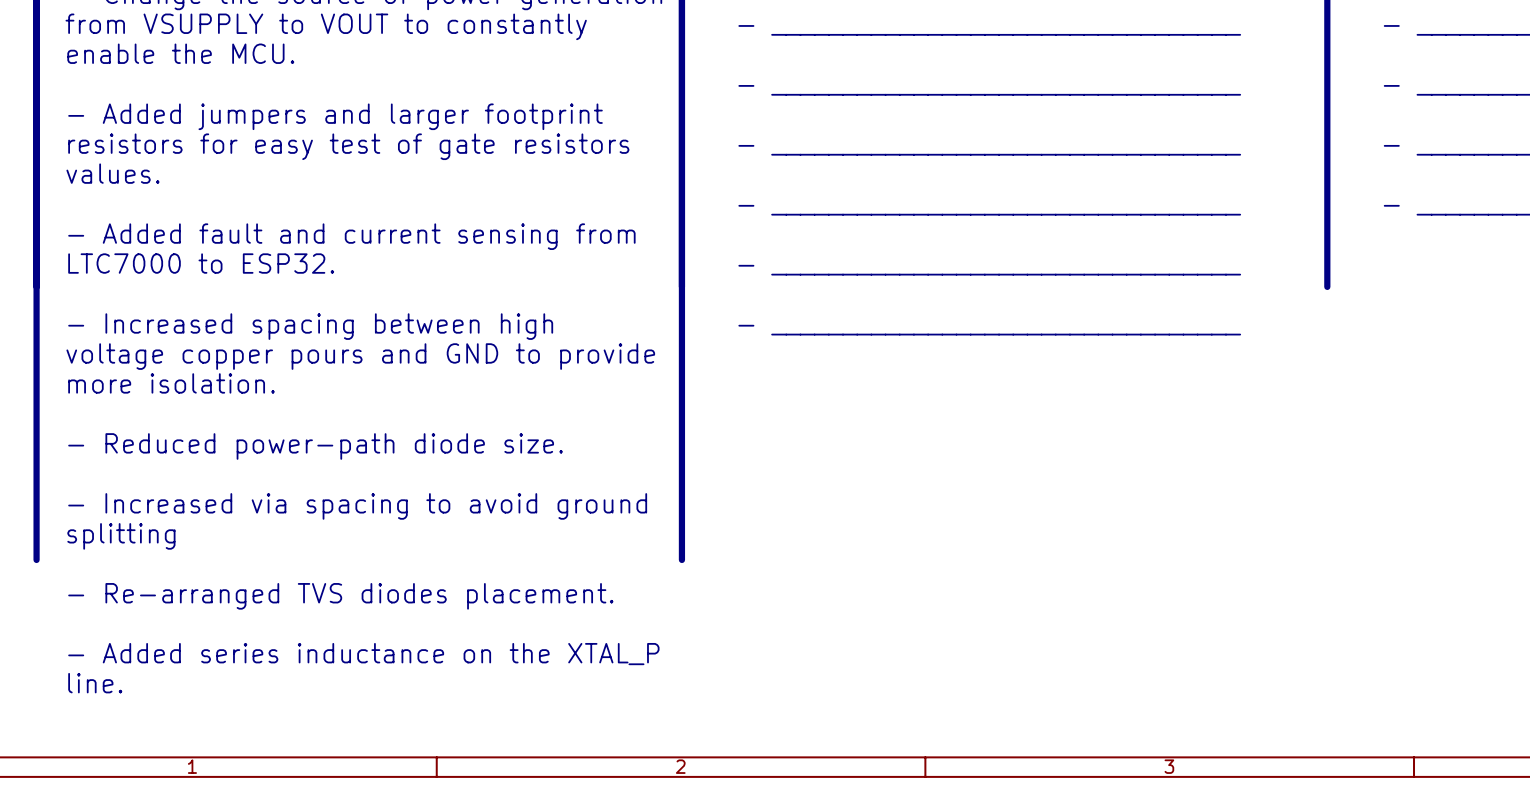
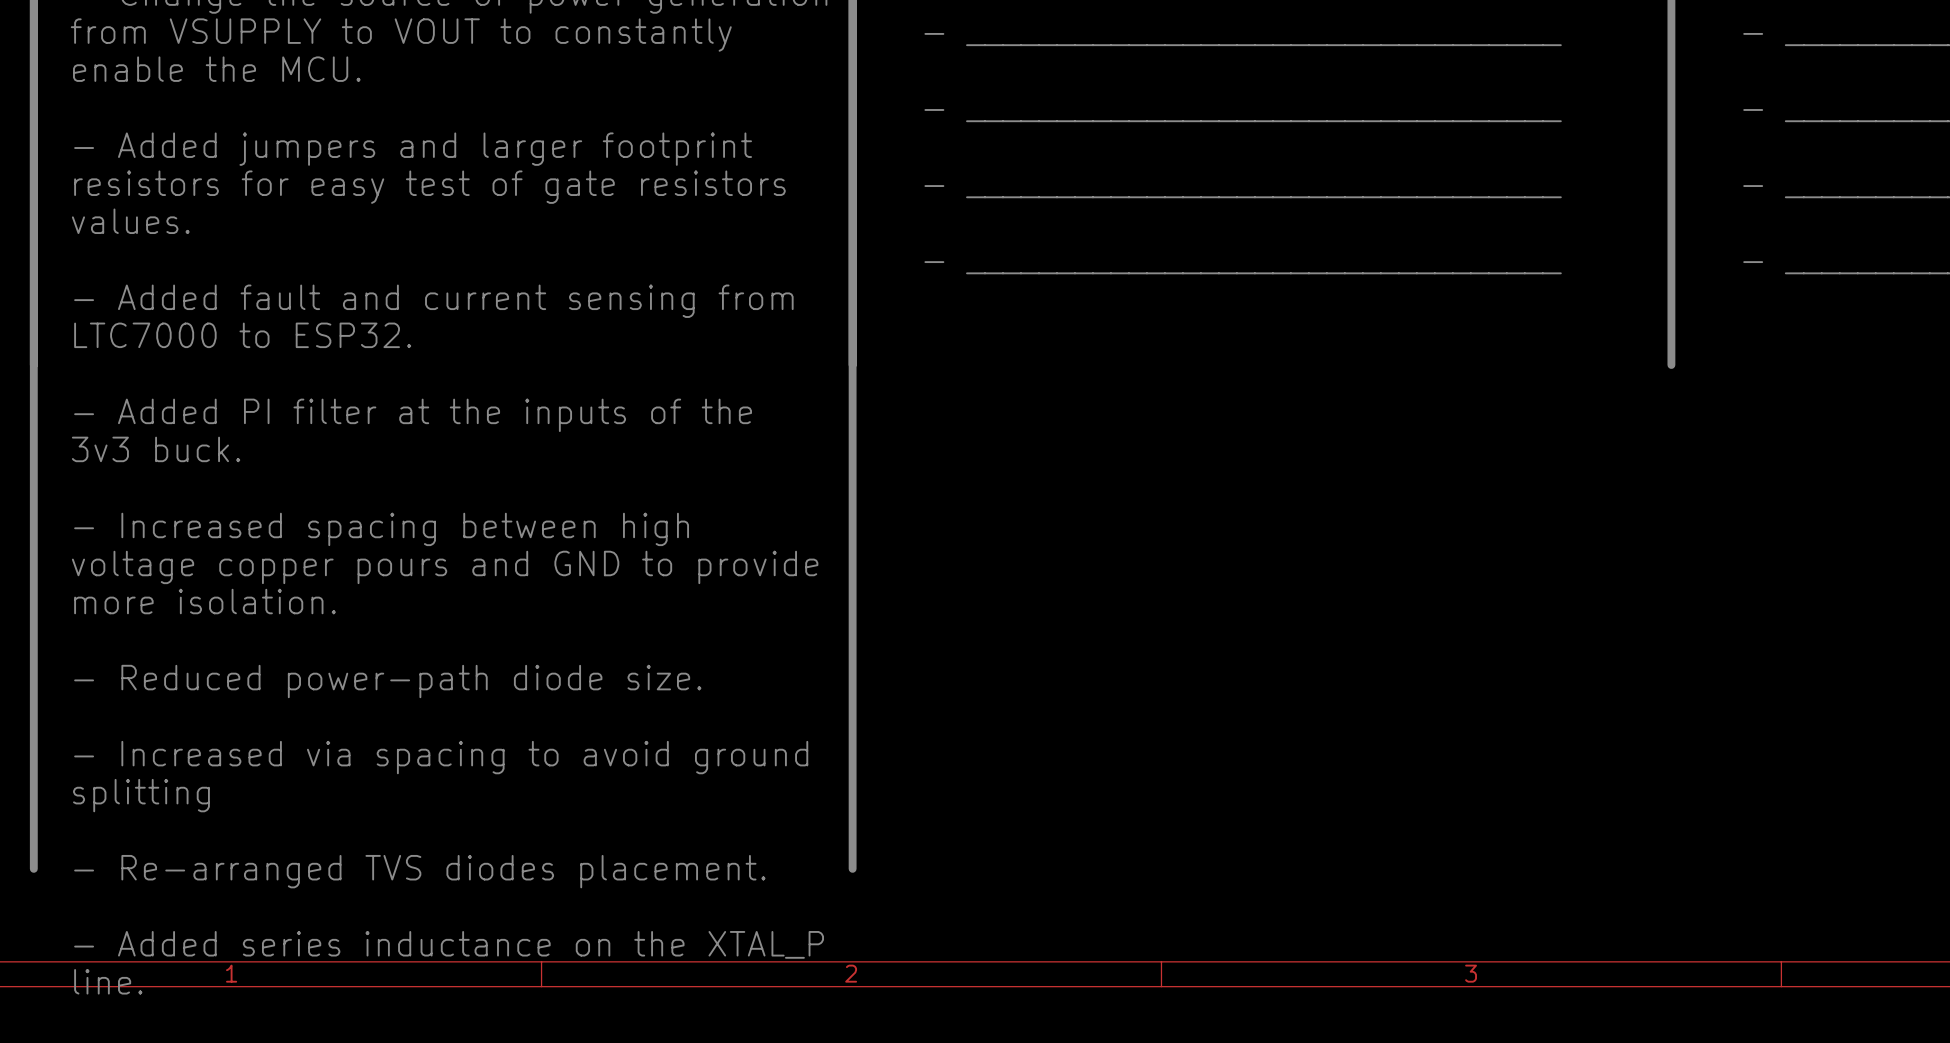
text: - _________________________________ (989, 270) -> none
text: - Increased spacing between high (310, 326) -> - Added PI filter at the inputs of the (413, 415)
text: - _________________________________ (989, 330) -> none
text: voltage copper pours and GND to provide (360, 356) -> 3v3 buck. (156, 449)
text position: more isolation. (171, 383) -> more isolation. (205, 601)
text: none -> - Increased spacing between high (381, 529)
text: - Reduced power-path diode size. (315, 446) -> voltage copper pours and GND to provide (445, 567)
text: - Increased via spacing to avoid ground (357, 506) -> none
text: splitting (121, 536) -> - Reduced power-path diode size. (387, 681)
line: none -> (33, 711) (33, 868)
line: none -> (852, 711) (852, 868)
text: - Re-arranged TVS diodes placement. (340, 596) -> - Increased via spacing to avoid ground (441, 757)
text: none -> splitting (141, 795)
text position: - Added series inductance on the XTAL_P (363, 654) -> - Added series inductance on the XTAL_P (449, 944)
text: line. (95, 683) -> - Re-arranged TVS diodes placement. (419, 871)
text: none -> line. (108, 981)

